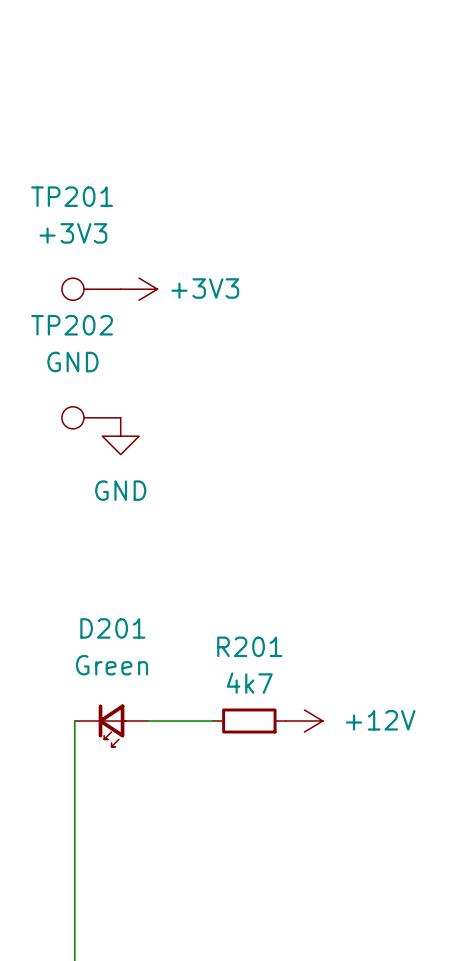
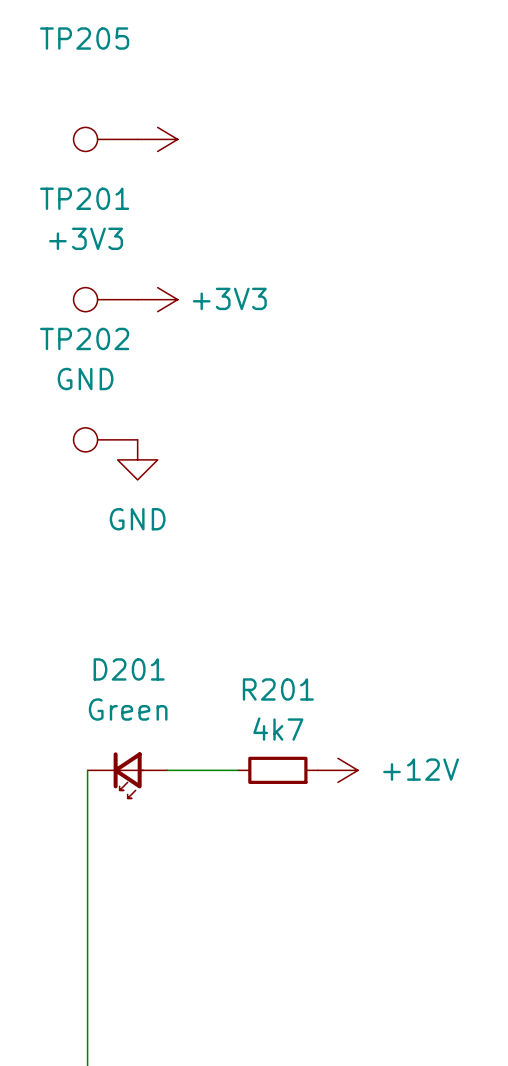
TP205: none -> (105, 139)
power symbol: none -> (157, 139)

